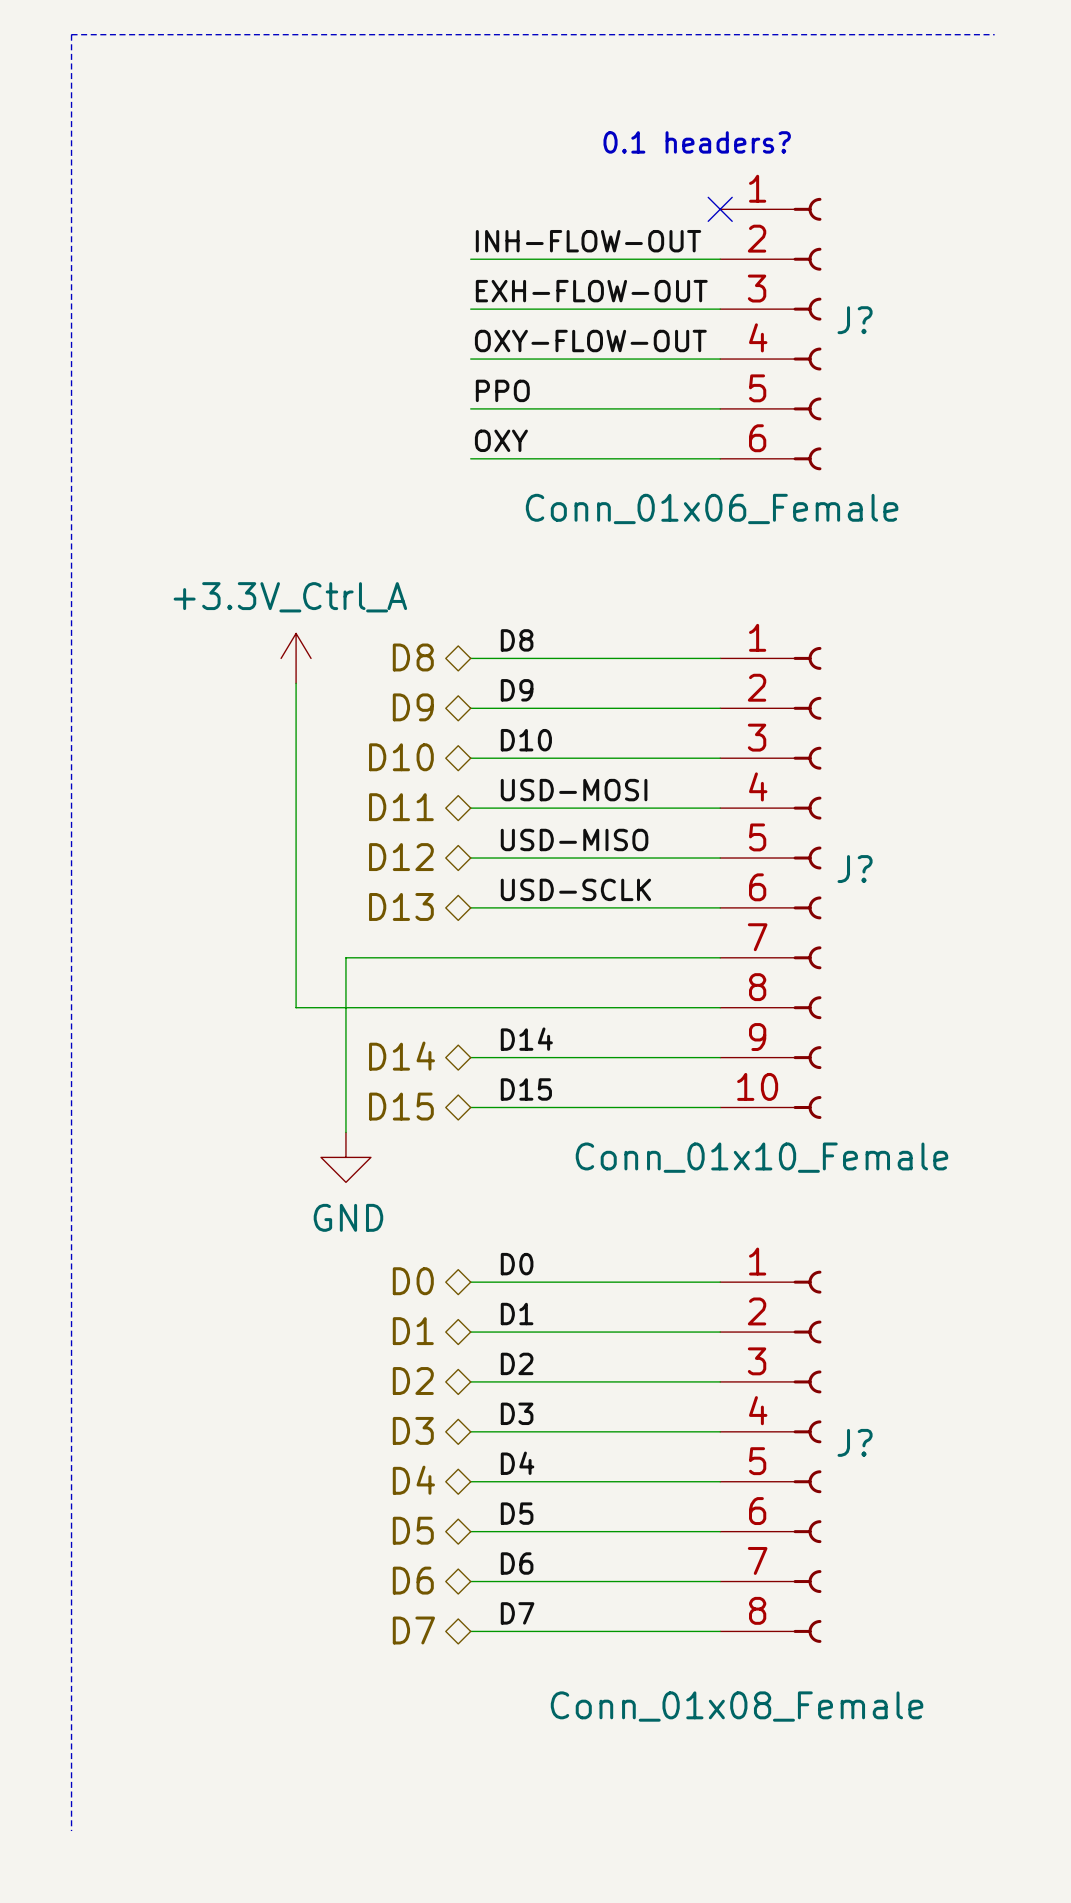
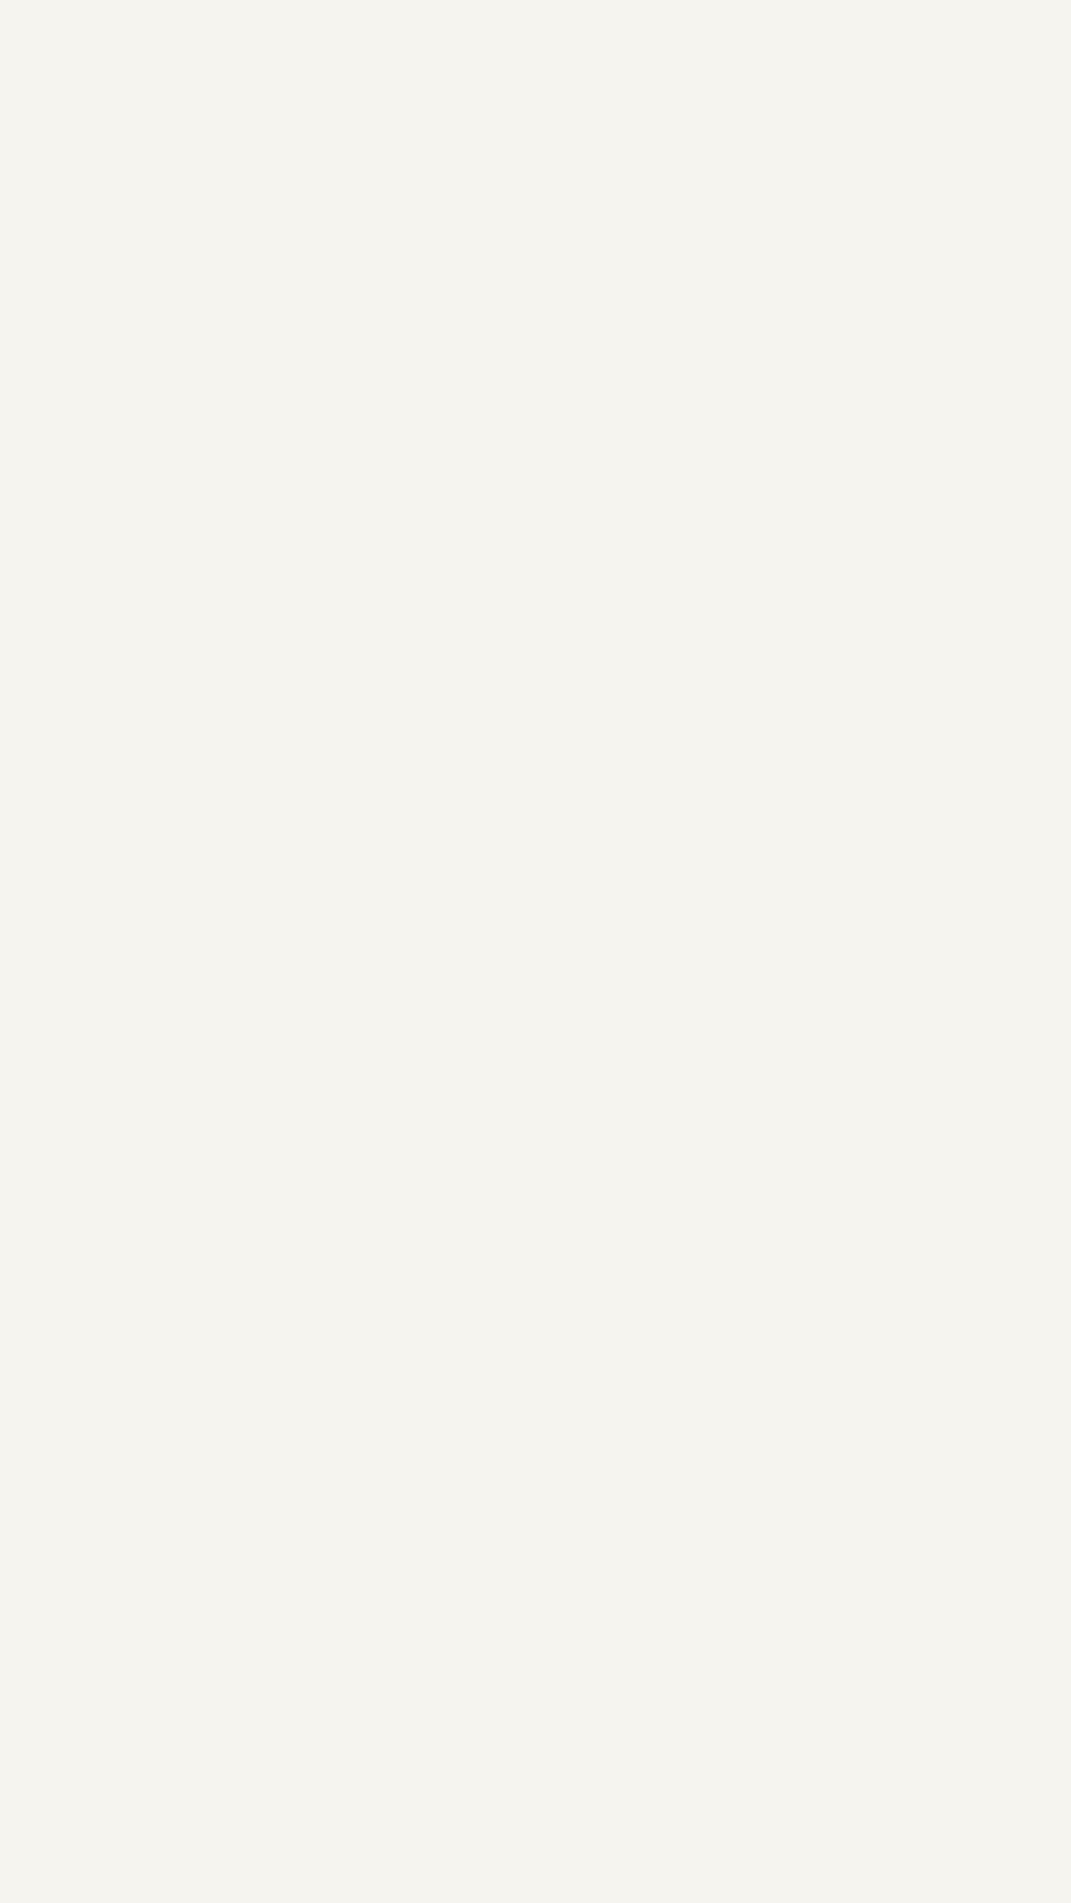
line: (994, 34) (71, 34) (71, 1831) -> none
text: 0.1 headers? (697, 142) -> none
no-connect mark: (720, 209) -> none
label: INH-FLOW-OUT (588, 241) -> none
wire: (470, 259) (720, 259) -> none
label: EXH-FLOW-OUT (591, 291) -> none
wire: (470, 309) (720, 309) -> none
J?: Conn_01x06_Female (770, 334) -> none
label: OXY-FLOW-OUT (590, 341) -> none
wire: (470, 359) (720, 359) -> none
label: PPO (502, 390) -> none
wire: (470, 408) (720, 408) -> none
label: OXY (501, 440) -> none
wire: (470, 458) (720, 458) -> none
label: D8 (517, 640) -> none
hierarchical label: D8 (413, 657) -> none
power symbol: +3.3V_Ctrl_A (296, 658) -> none
wire: (470, 658) (720, 658) -> none
wire: (296, 683) (296, 1007) (720, 1007) -> none
label: D9 (517, 690) -> none
hierarchical label: D9 (413, 707) -> none
wire: (470, 708) (720, 708) -> none
label: D10 (526, 740) -> none
hierarchical label: D10 (401, 757) -> none
wire: (470, 758) (720, 758) -> none
label: USD-MOSI (574, 790) -> none
hierarchical label: D11 (401, 807) -> none
wire: (470, 808) (720, 808) -> none
label: USD-MISO (574, 839) -> none
hierarchical label: D12 (401, 857) -> none
wire: (470, 858) (720, 858) -> none
J?: Conn_01x10_Female (770, 882) -> none
label: USD-SCLK (575, 889) -> none
hierarchical label: D13 (401, 906) -> none
wire: (470, 907) (720, 907) -> none
wire: (720, 957) (345, 957) (345, 1132) -> none
label: D14 (526, 1039) -> none
hierarchical label: D14 (402, 1056) -> none
wire: (470, 1057) (720, 1057) -> none
label: D15 (526, 1089) -> none
hierarchical label: D15 (401, 1106) -> none
wire: (470, 1107) (720, 1107) -> none
power symbol: GND (345, 1157) -> none
label: D0 (517, 1264) -> none
hierarchical label: D0 (413, 1281) -> none
wire: (470, 1282) (720, 1282) -> none
label: D1 (517, 1314) -> none
hierarchical label: D1 (413, 1331) -> none
wire: (470, 1332) (720, 1332) -> none
label: D2 (517, 1363) -> none
hierarchical label: D2 (413, 1381) -> none
wire: (470, 1381) (720, 1381) -> none
label: D3 (517, 1413) -> none
hierarchical label: D3 (413, 1430) -> none
wire: (470, 1431) (720, 1431) -> none
J?: Conn_01x08_Female (770, 1456) -> none
label: D4 (517, 1463) -> none
hierarchical label: D4 (413, 1480) -> none
wire: (470, 1481) (720, 1481) -> none
label: D5 (517, 1513) -> none
hierarchical label: D5 (413, 1530) -> none
wire: (470, 1531) (720, 1531) -> none
label: D6 (517, 1563) -> none
hierarchical label: D6 (413, 1580) -> none
wire: (470, 1581) (720, 1581) -> none
label: D7 (517, 1613) -> none
hierarchical label: D7 (413, 1630) -> none
wire: (470, 1631) (720, 1631) -> none

